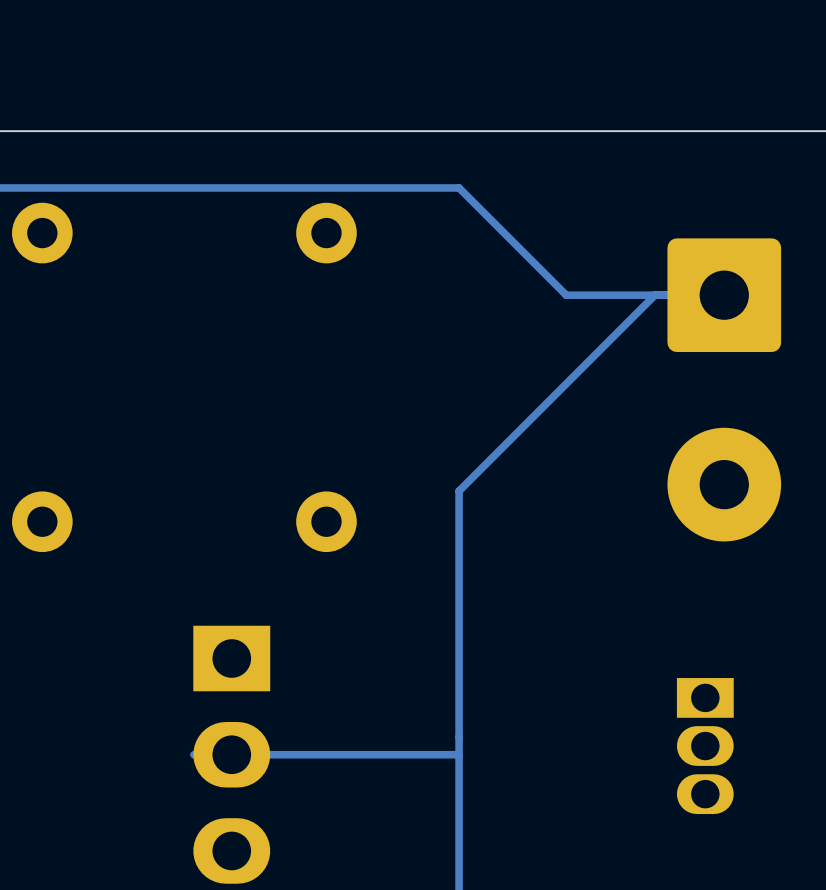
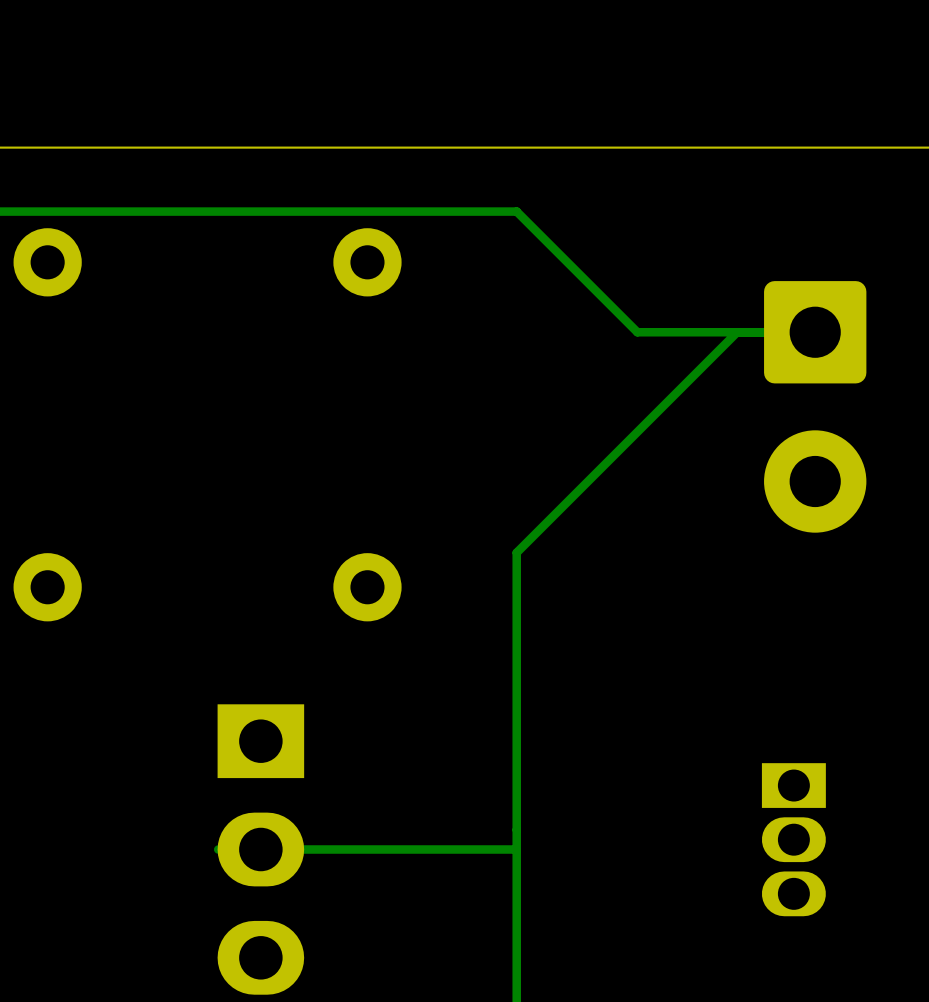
part footprint: [667, 238, 782, 542] -> [764, 281, 867, 533]

